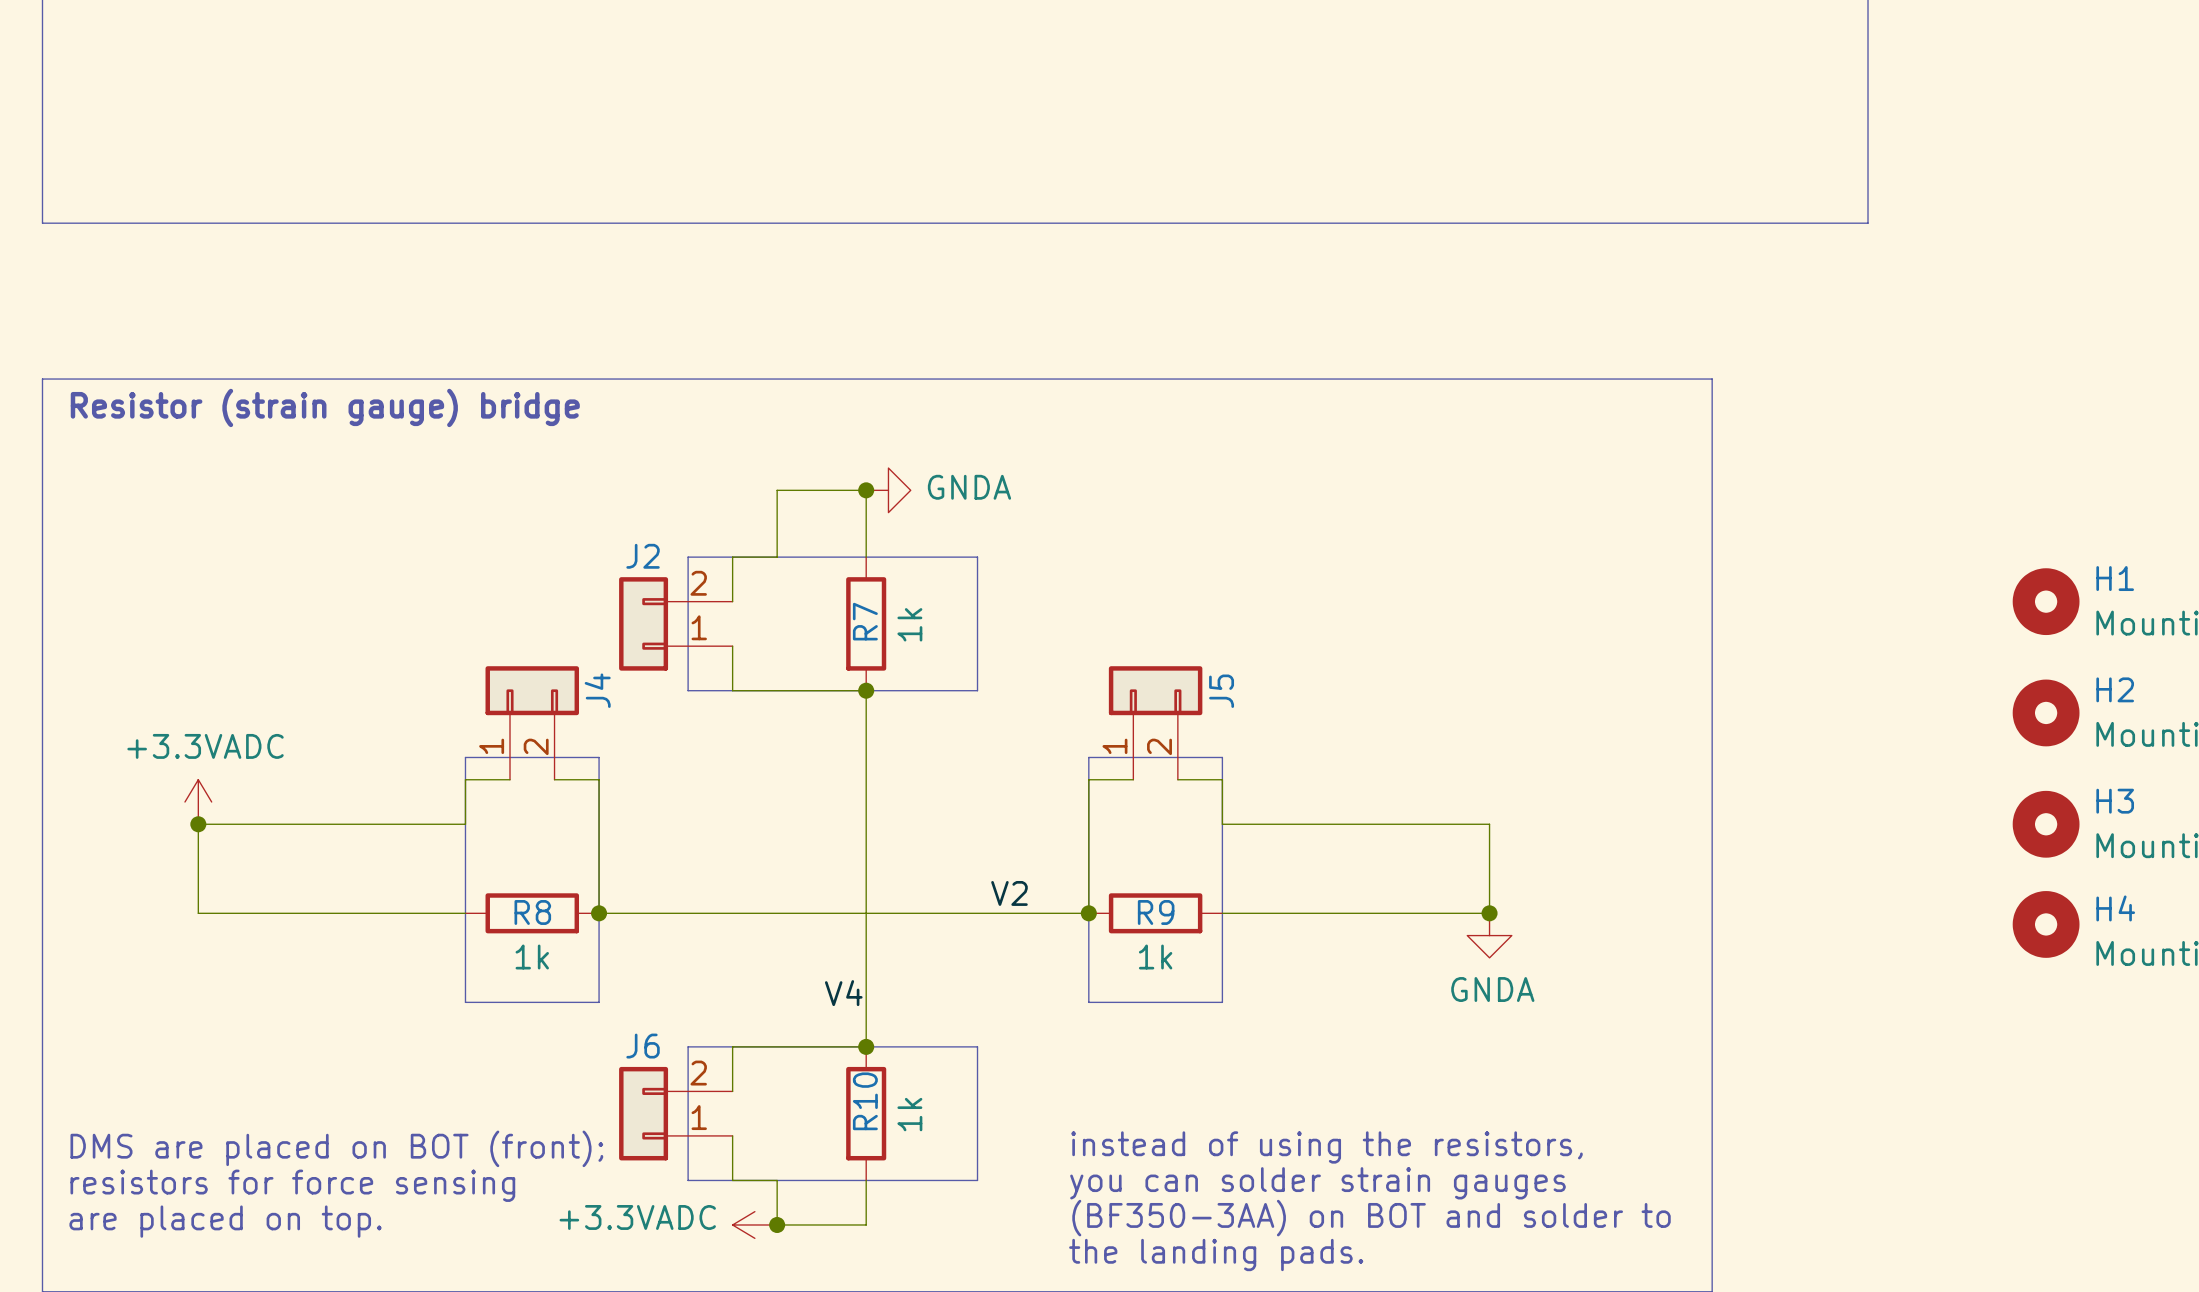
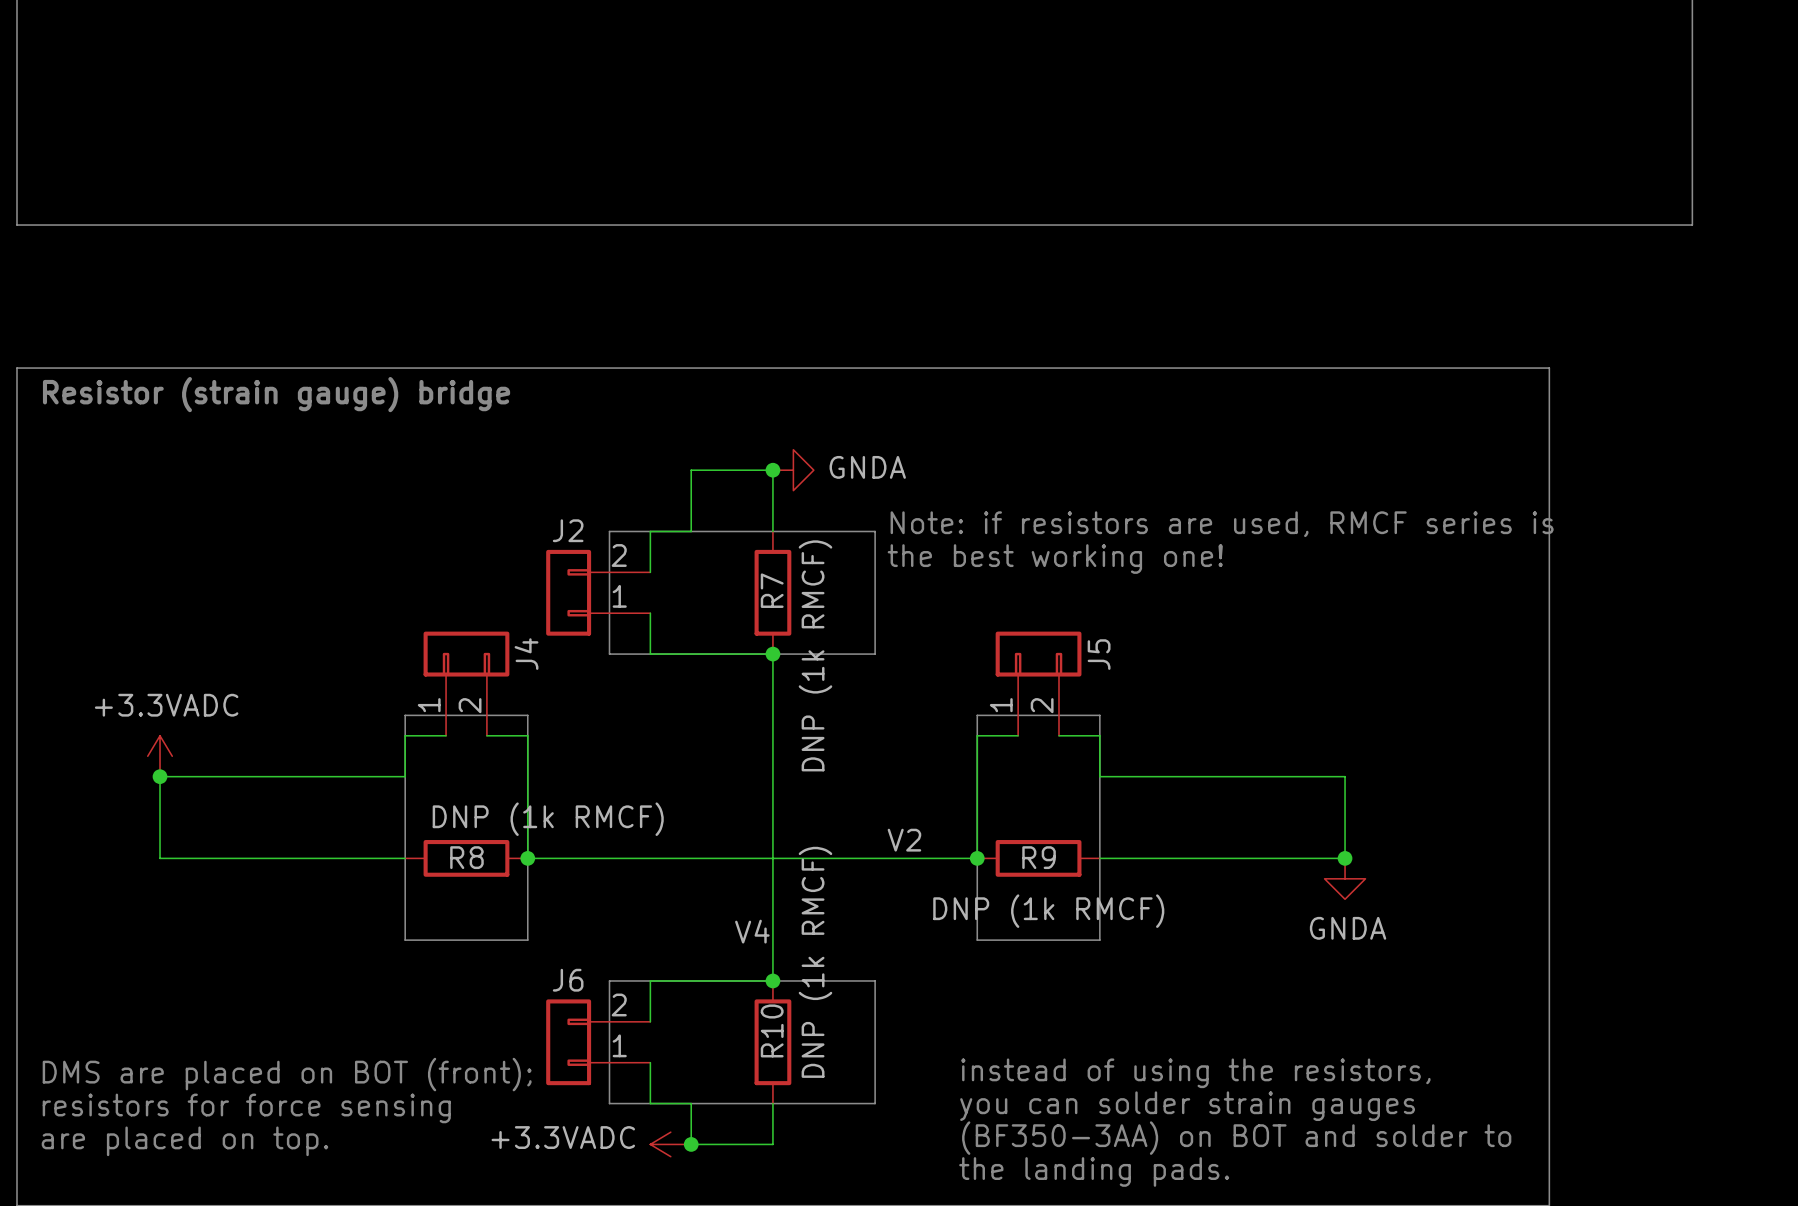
text: none -> Note: if resistors are used, RMCF series is (1222, 524)
text: none -> the best working one! (1055, 559)
R7 value: 1k (909, 624) -> DNP (1k RMCF) (815, 655)
R8 value: 1k (532, 957) -> DNP (1k RMCF) (548, 819)
R9 value: 1k (1155, 957) -> DNP (1k RMCF) (1048, 911)
R10 value: 1k (909, 1114) -> DNP (1k RMCF) (815, 962)

